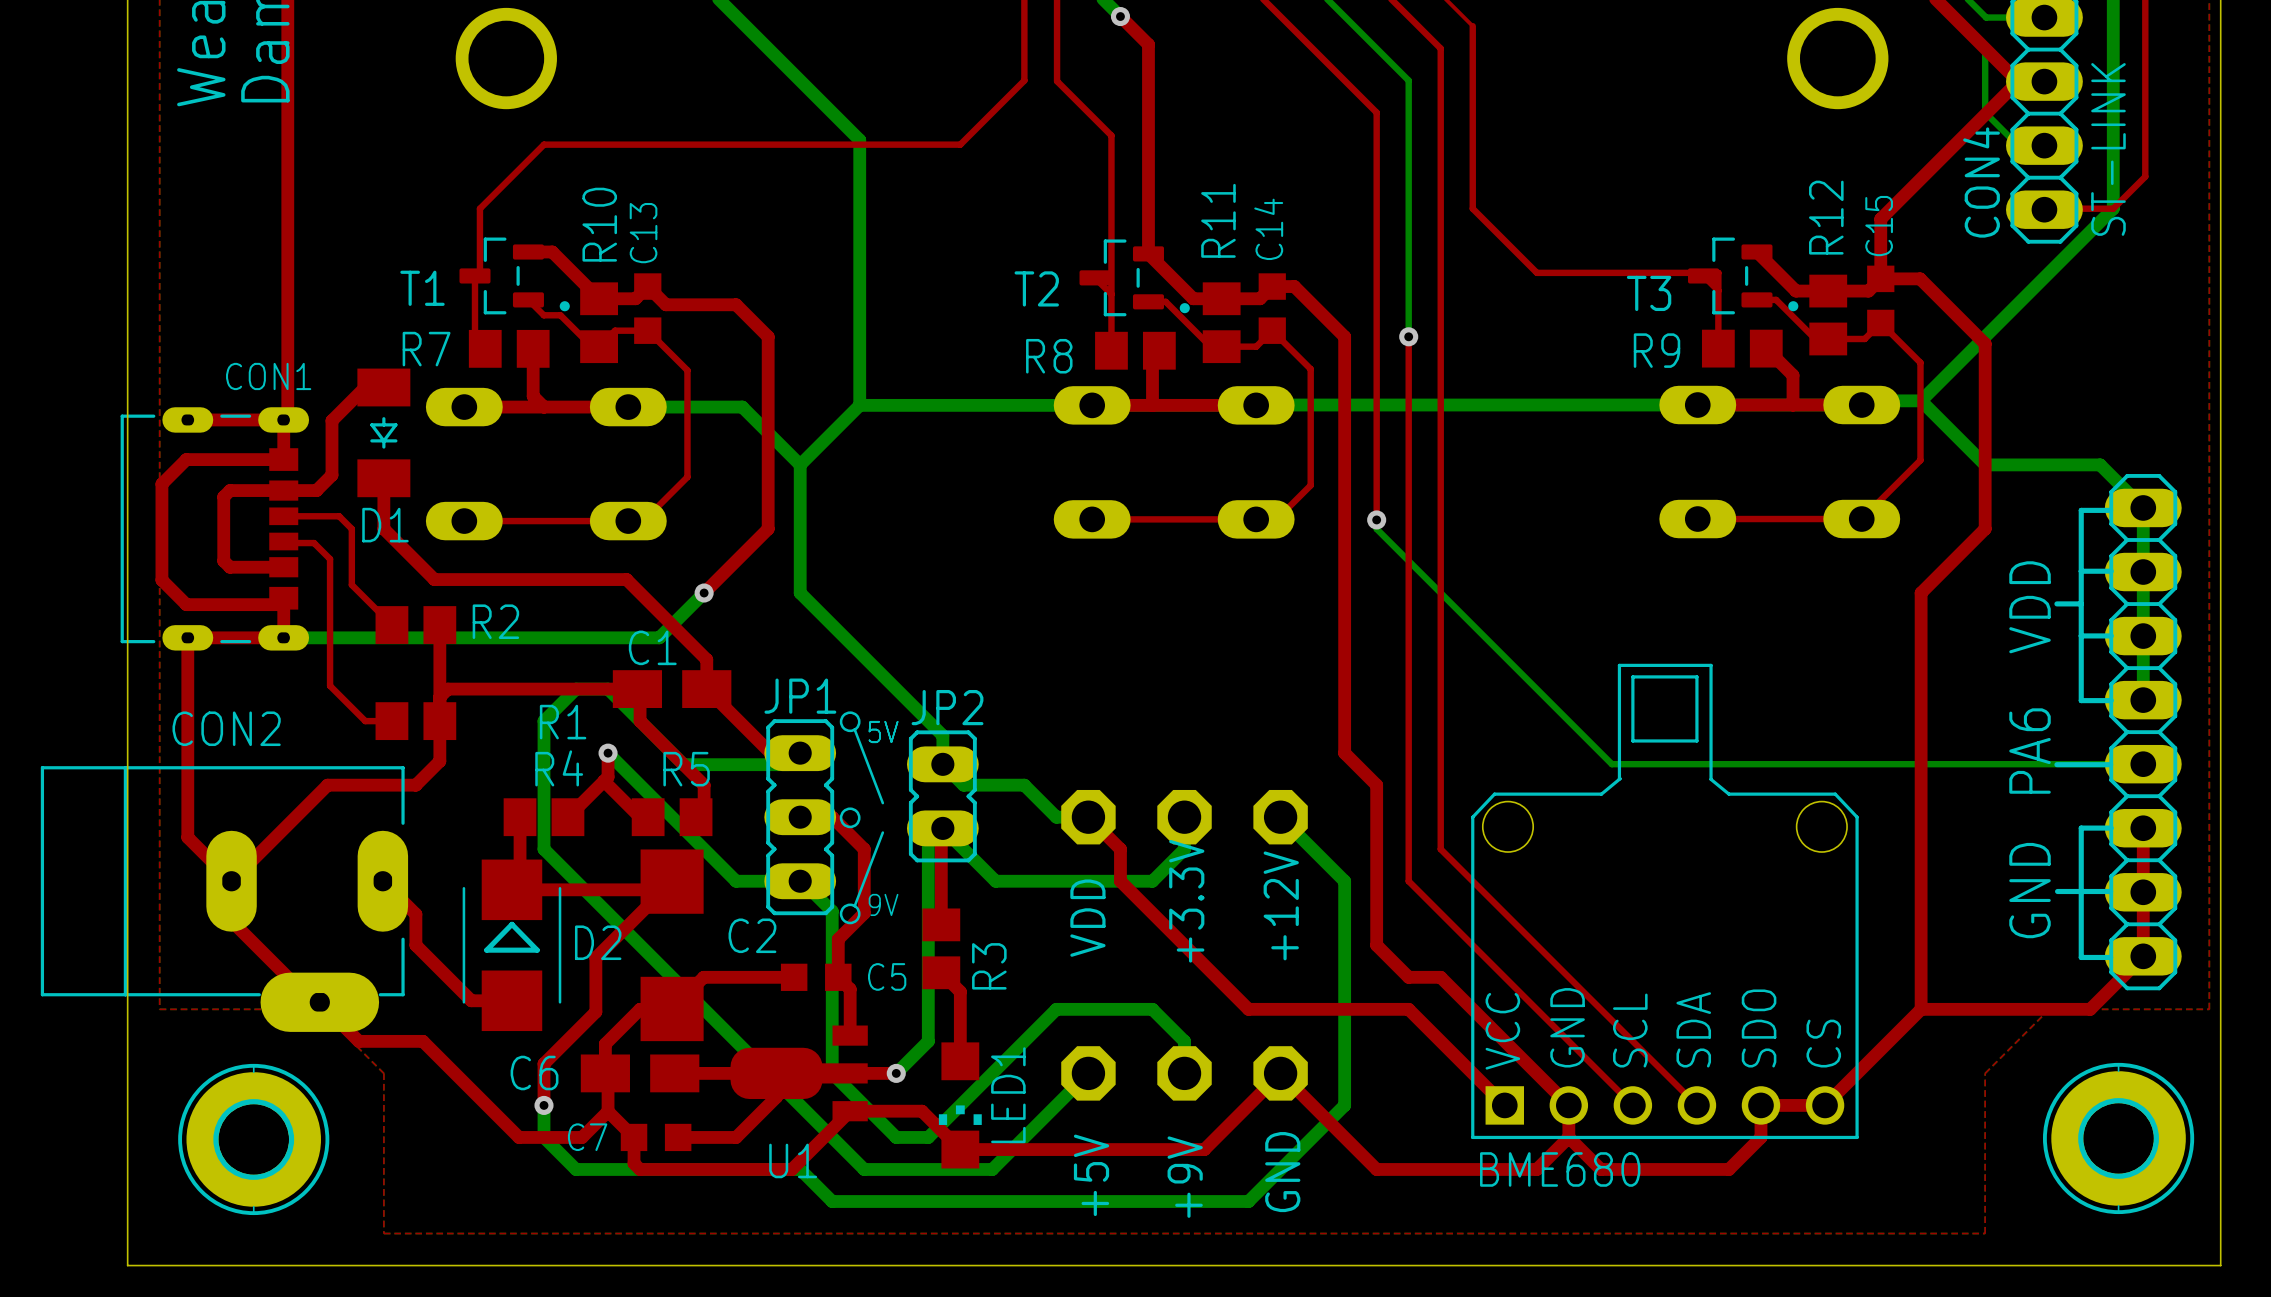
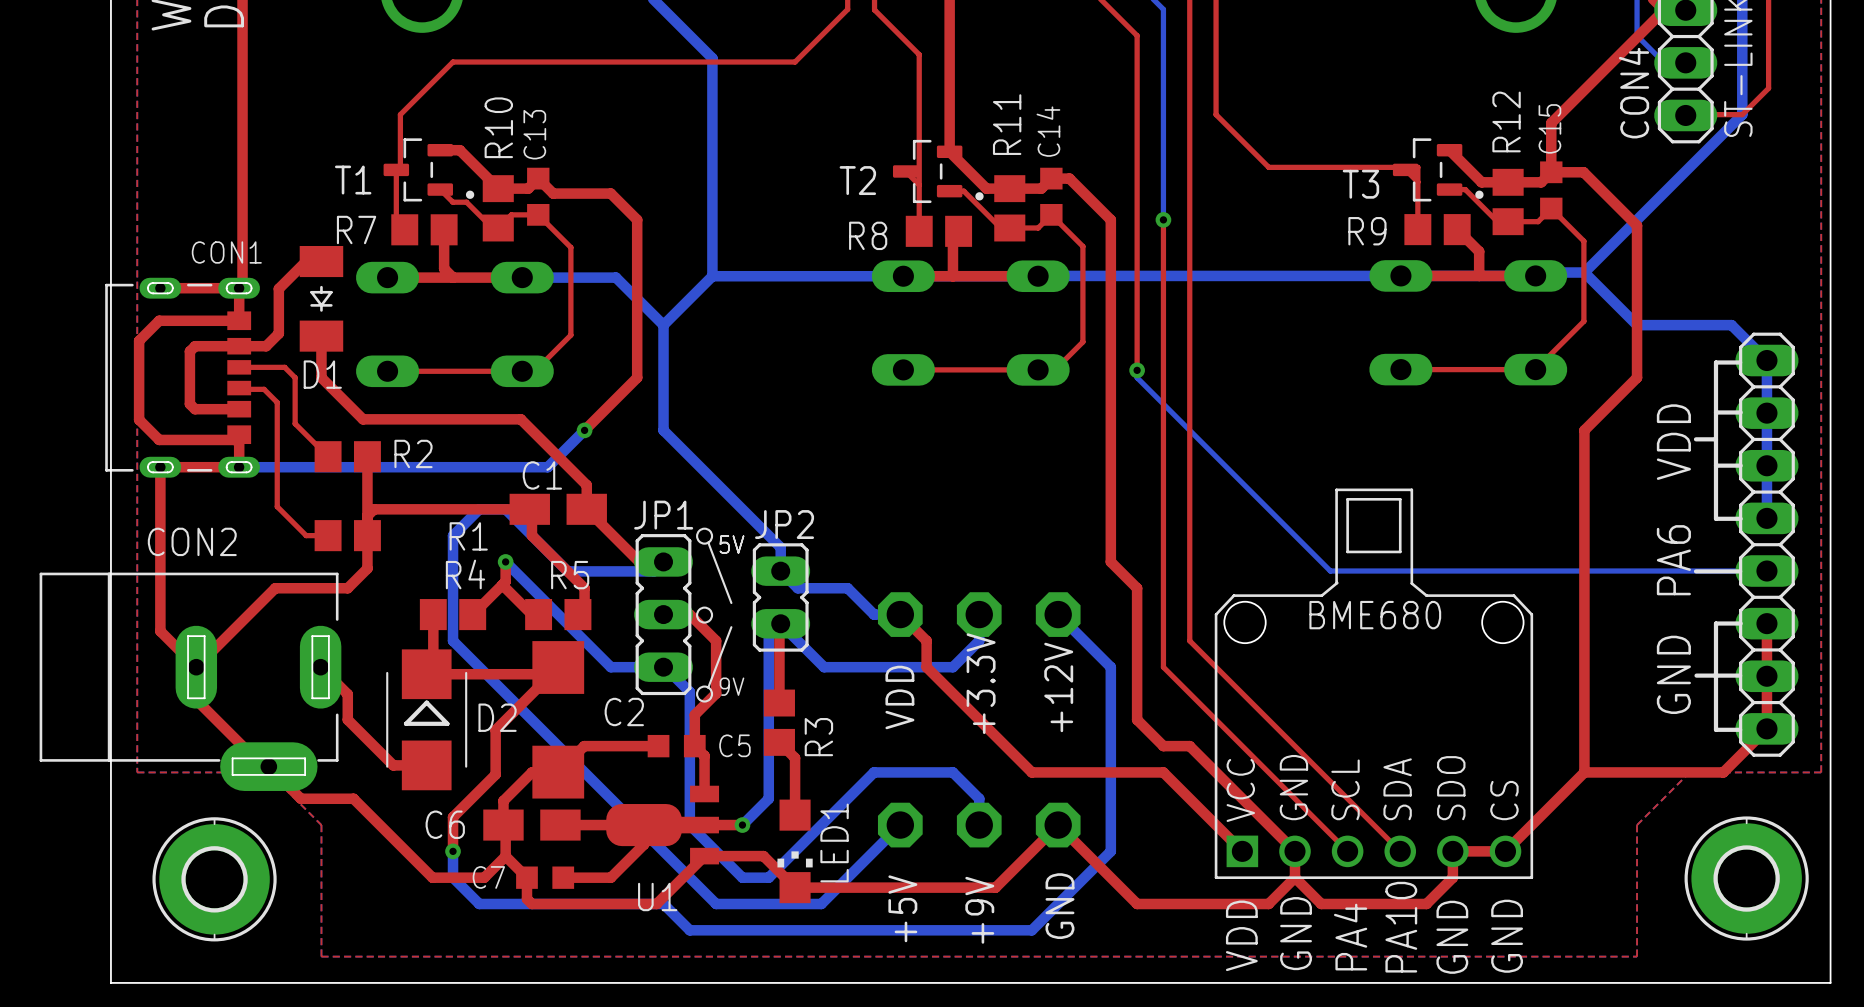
part value position: BME680 (1560, 1169) -> BME680 (1375, 615)
text: none -> PA10 (1401, 927)
text: none -> GND (1296, 933)
text: none -> VDD (1241, 935)
text: none -> GND (1507, 936)
text: none -> PA4 (1350, 937)
text: none -> GND (1452, 937)

